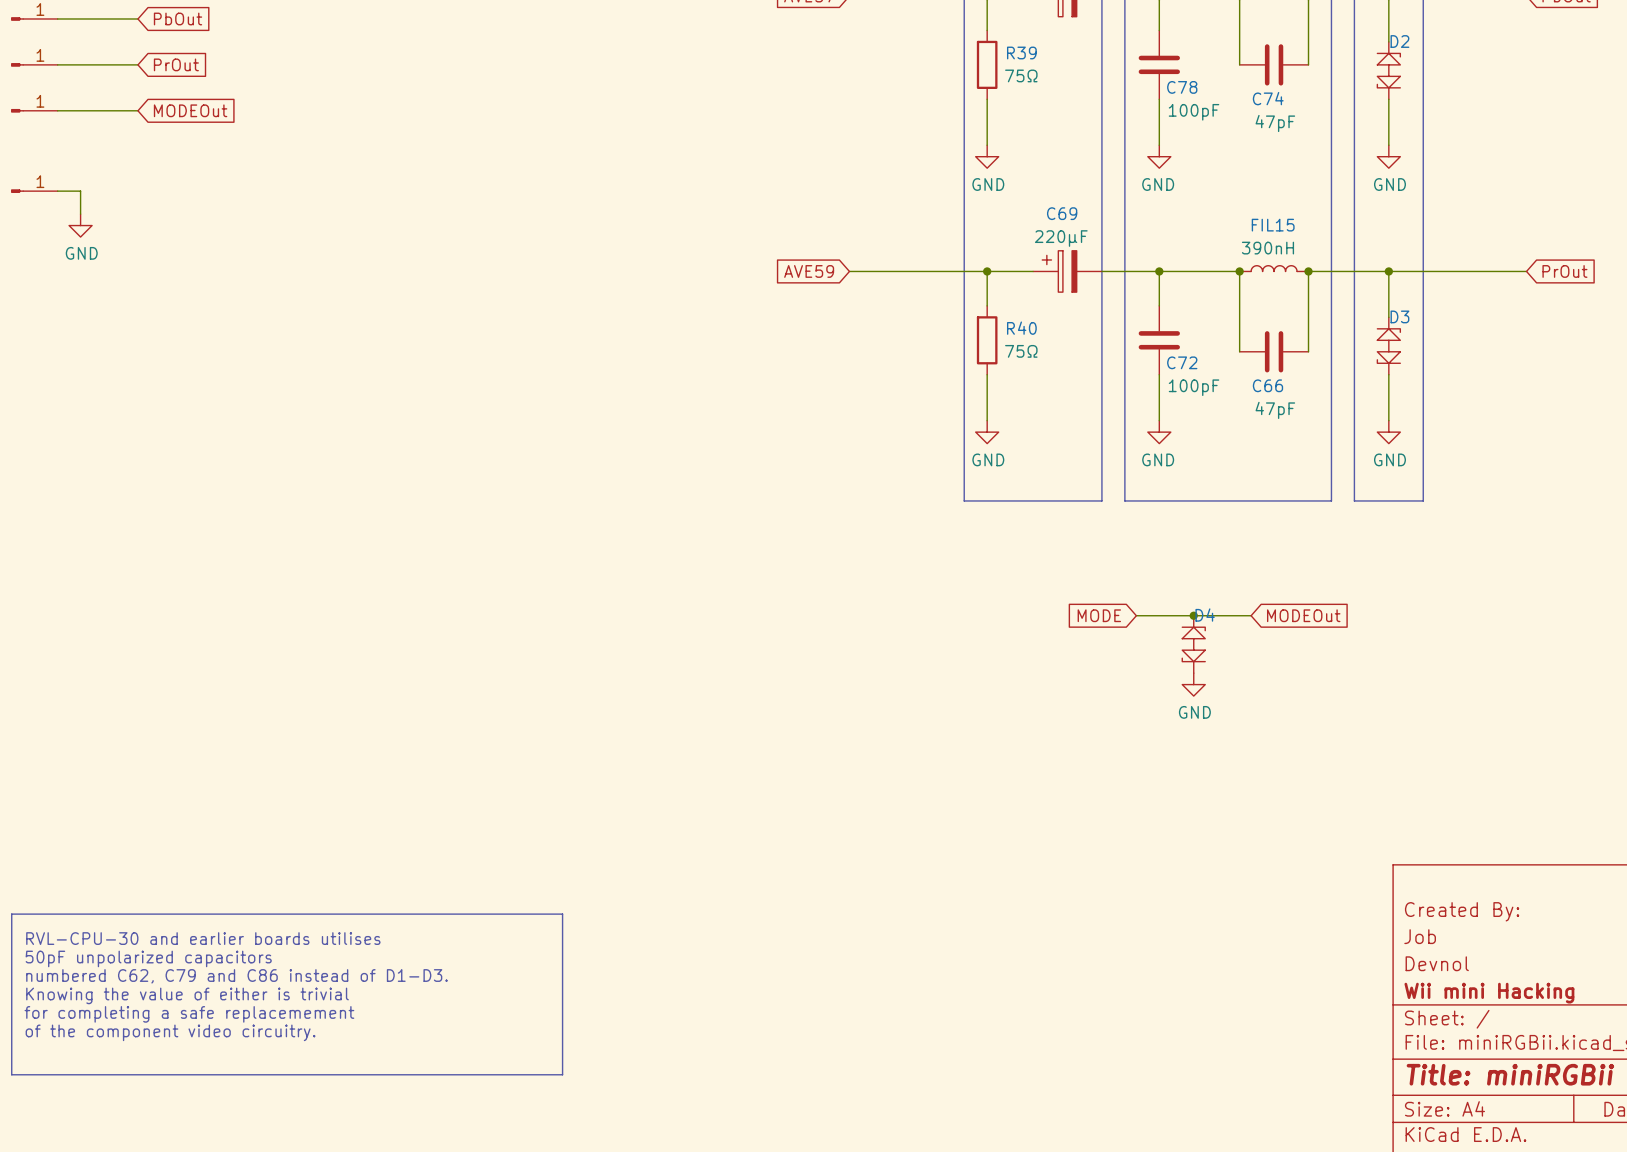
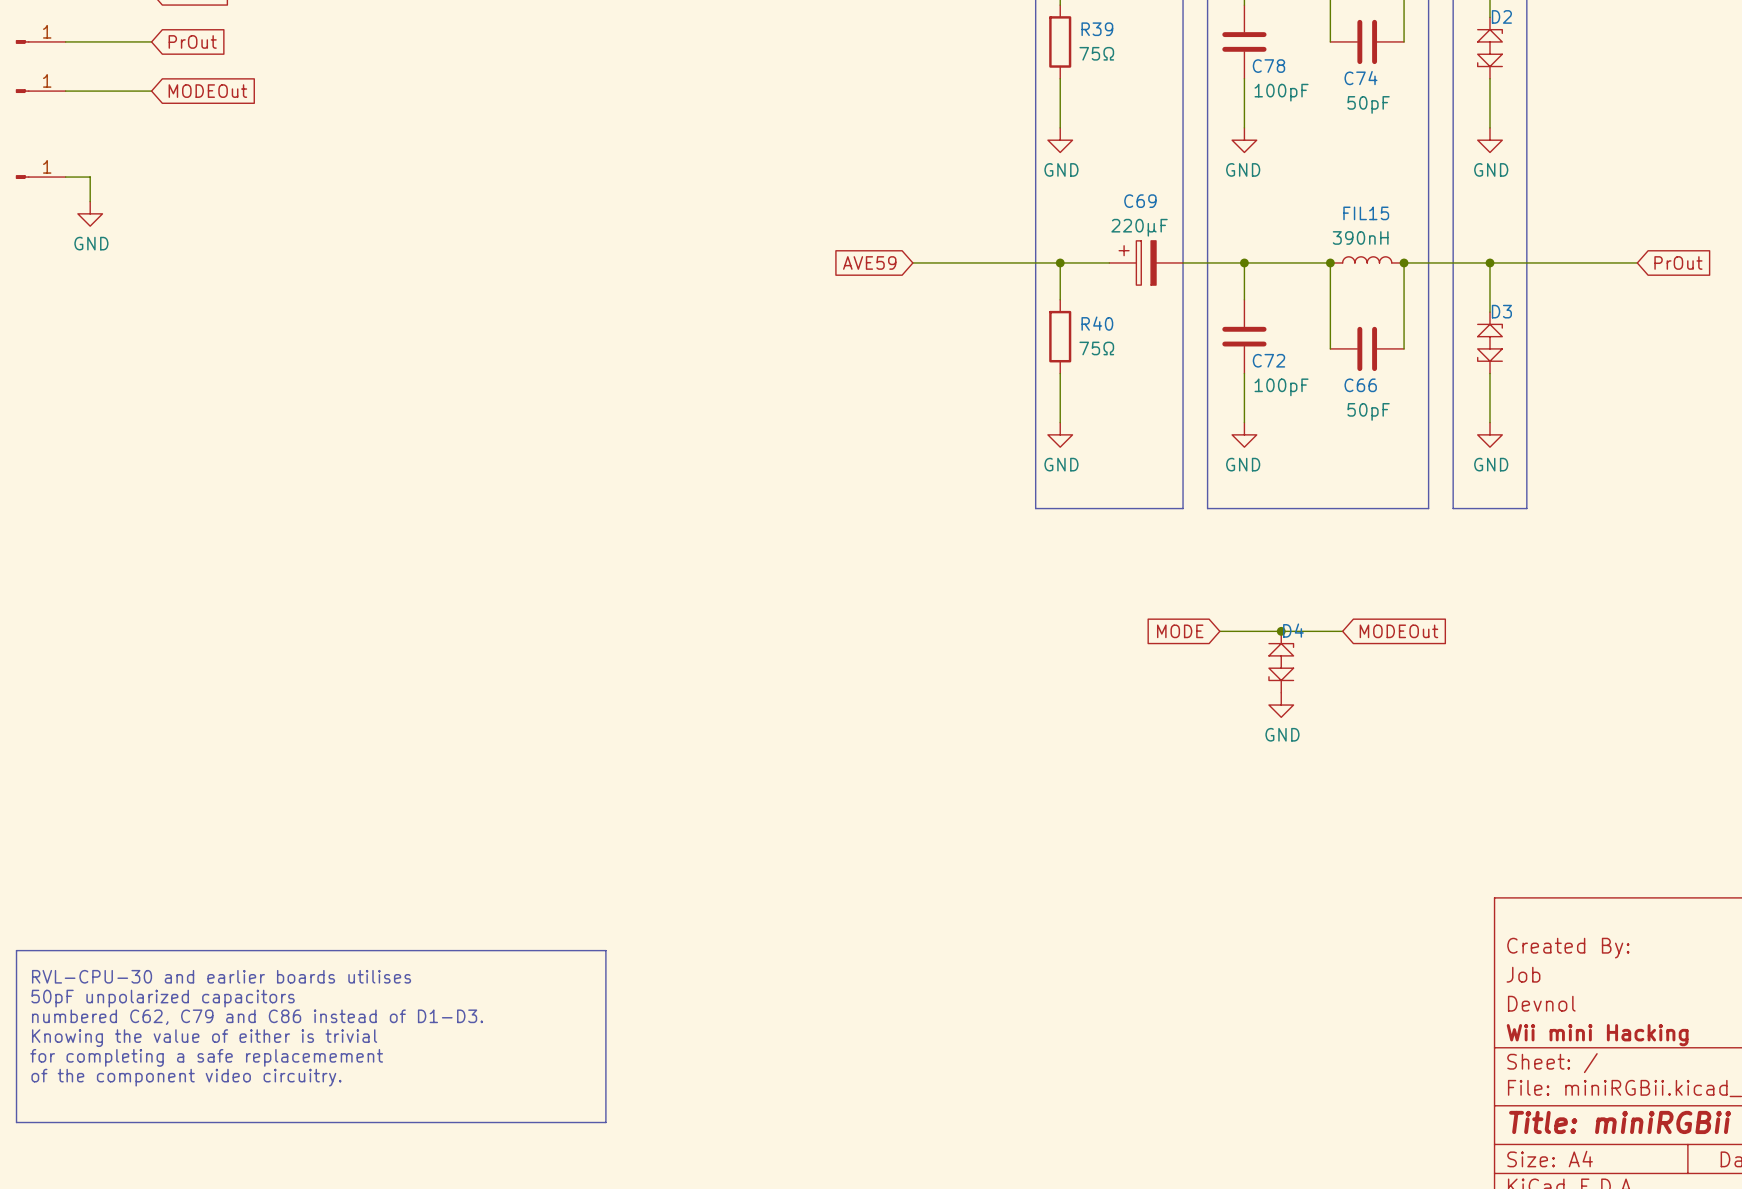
C74 value: 47pF (1275, 123) -> 50pF (1368, 104)
C66 value: 47pF (1275, 410) -> 50pF (1368, 411)

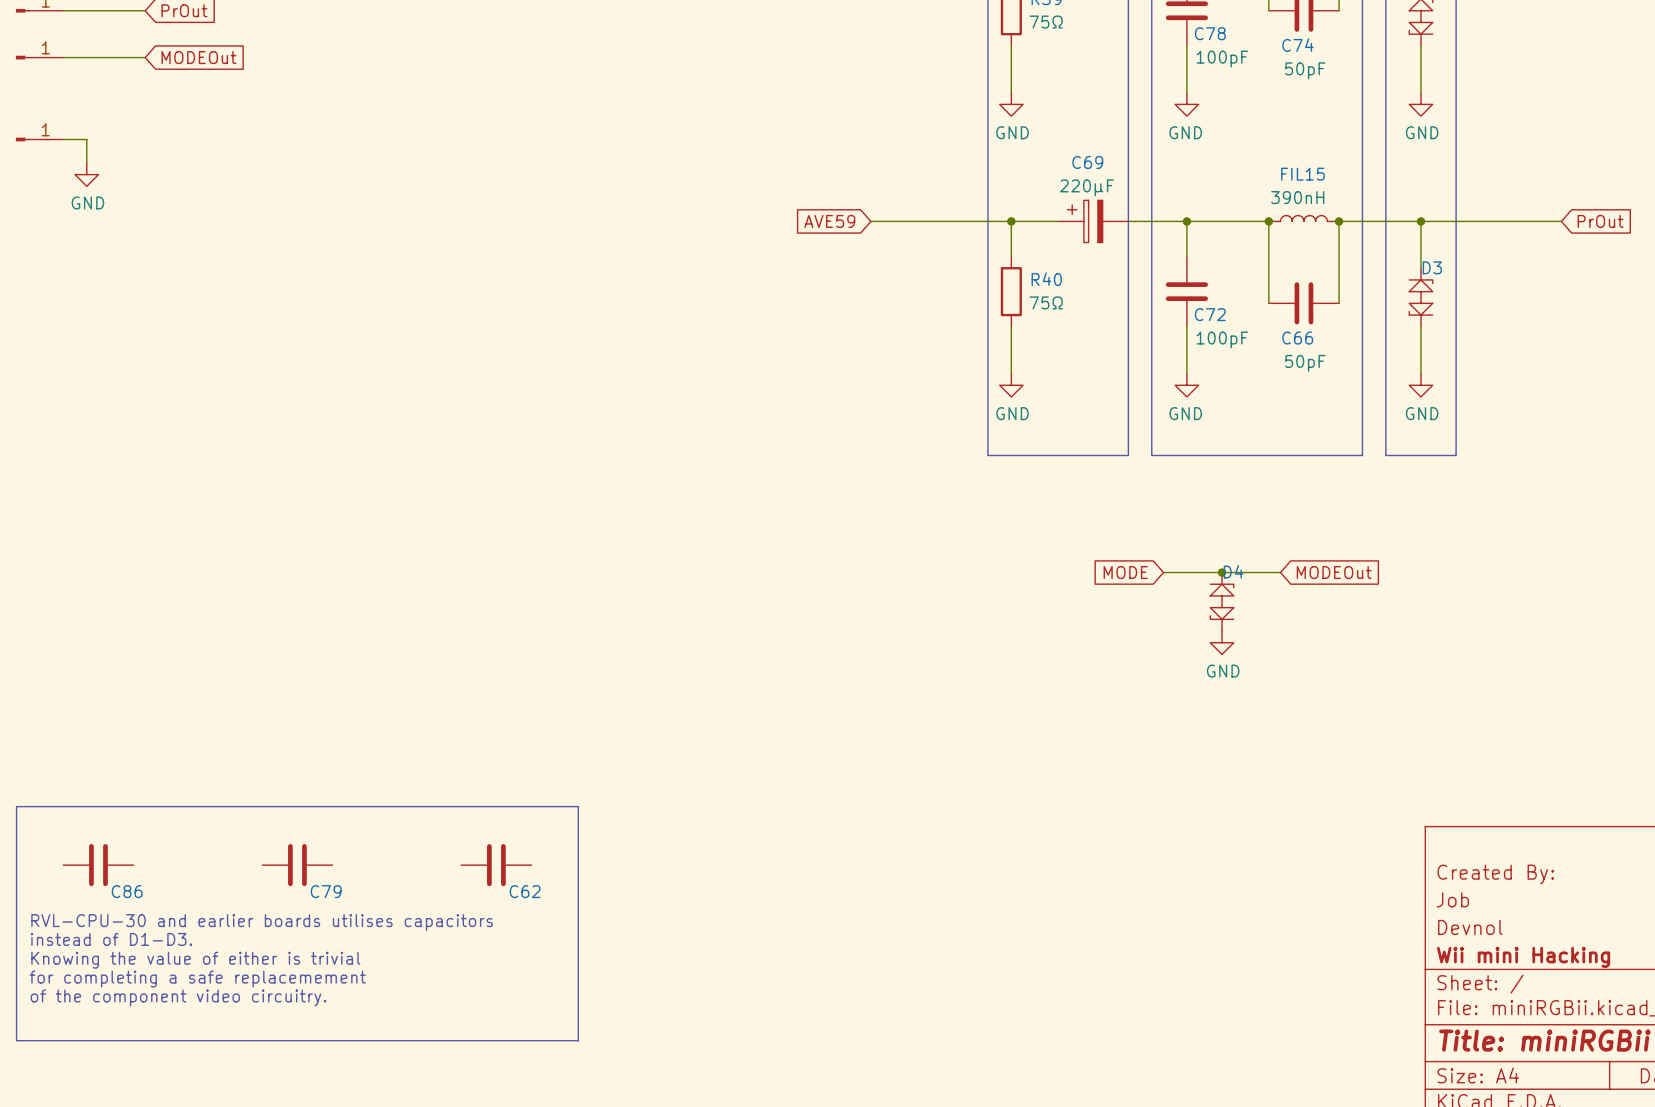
C86: none -> (98, 865)
C79: none -> (297, 865)
C62: none -> (496, 865)
line: (16, 950) (605, 950) -> (16, 876) (16, 806) (578, 806) (578, 876)
text: RVL-CPU-30 and earlier boards utilises (221, 976) -> none
text: 50pF unpolarized capacitors (163, 998) -> RVL-CPU-30 and earlier boards utilises capacitors (262, 922)
text: numbered C62, C79 and C86 instead of D1-D3. (257, 1017) -> instead of D1-D3. (111, 939)

